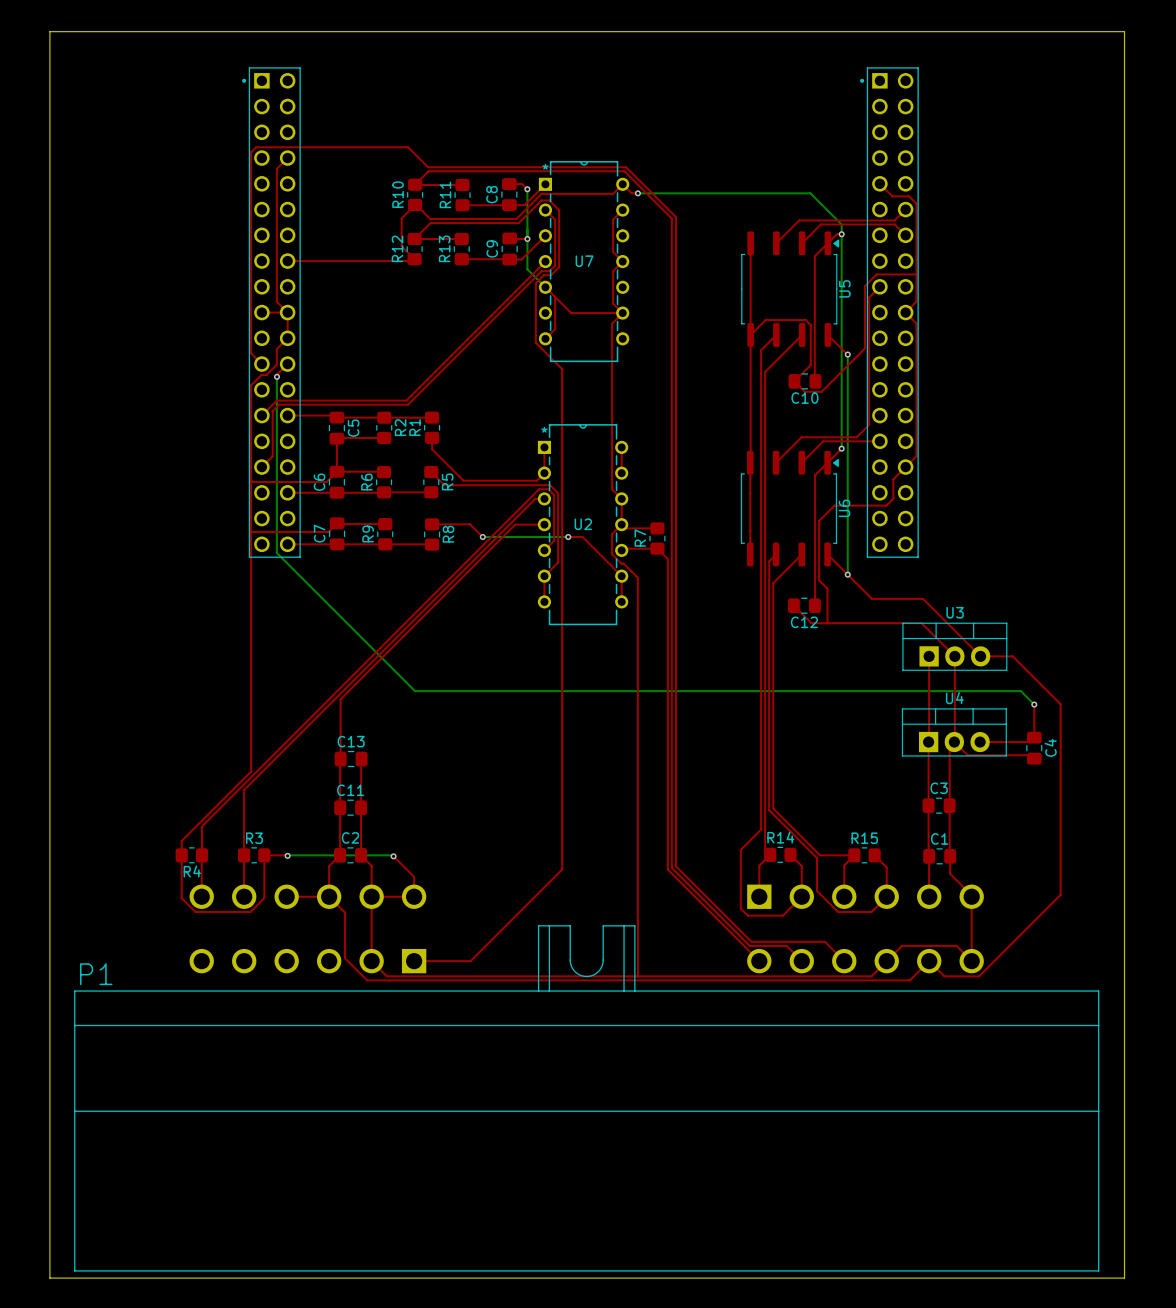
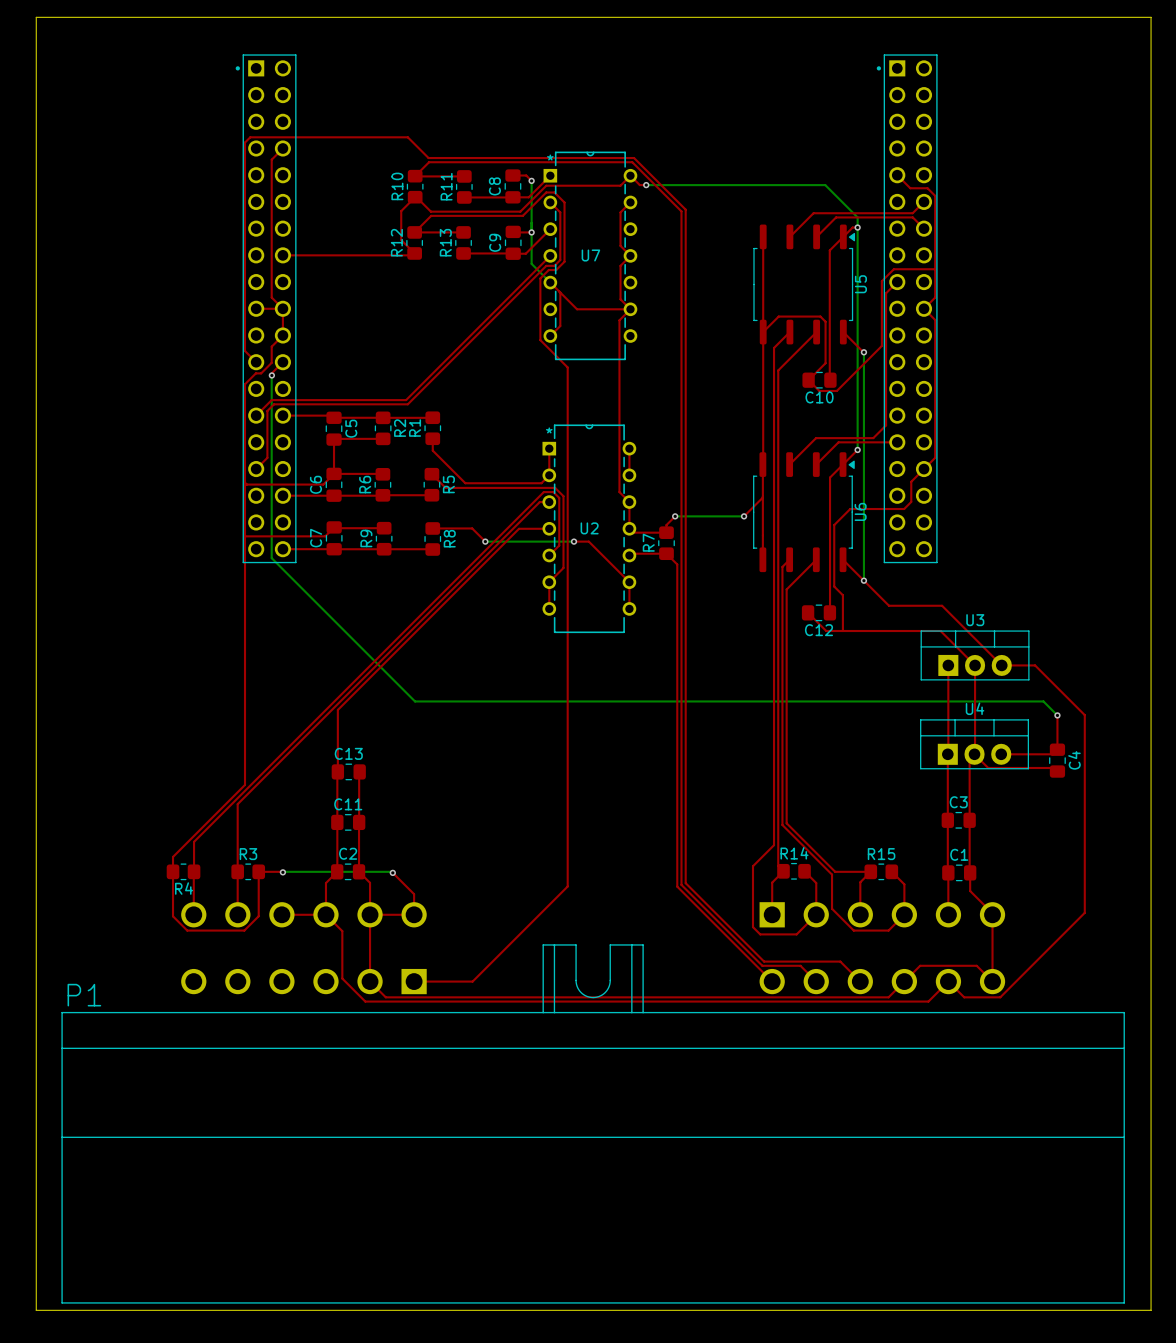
top track: none -> (762, 497) (744, 516)
top track: none -> (675, 516) (666, 525) (666, 532)
bottom track: none -> (675, 516) (744, 516)
via: none -> (675, 516)
via: none -> (744, 516)
top track: (621, 524) (612, 534) (612, 554) (637, 577) (637, 976) -> none

